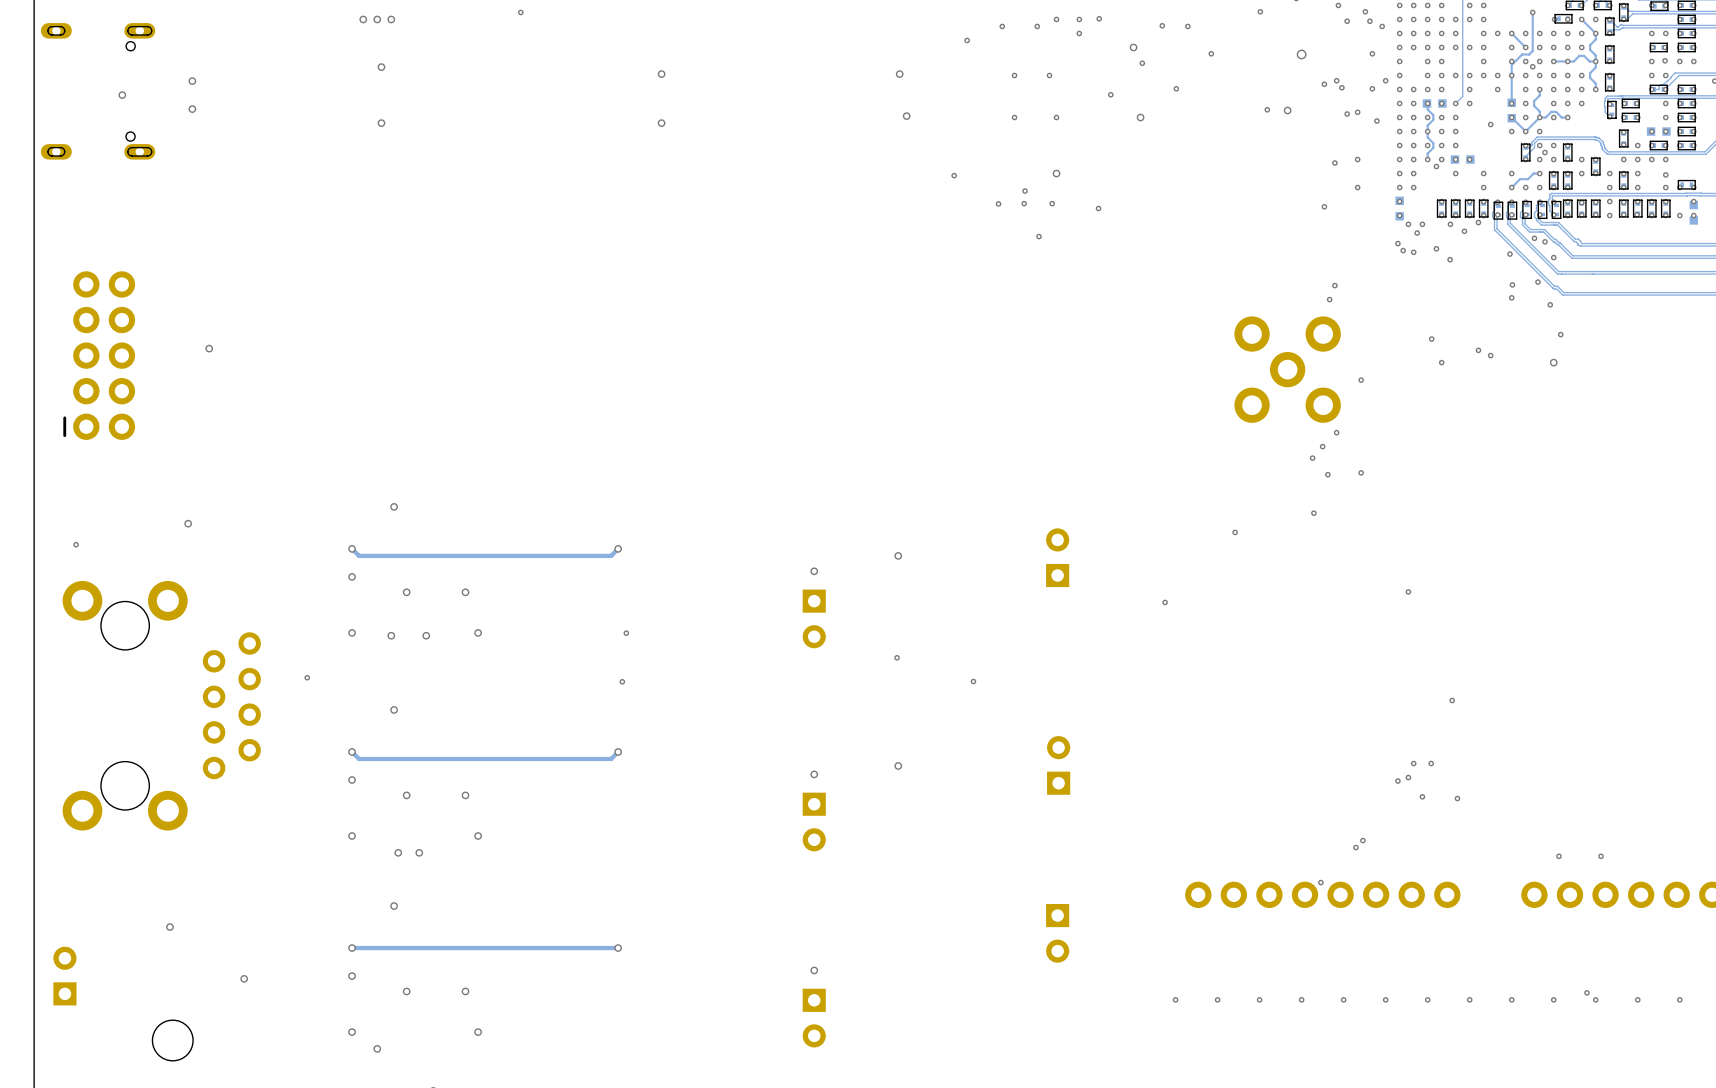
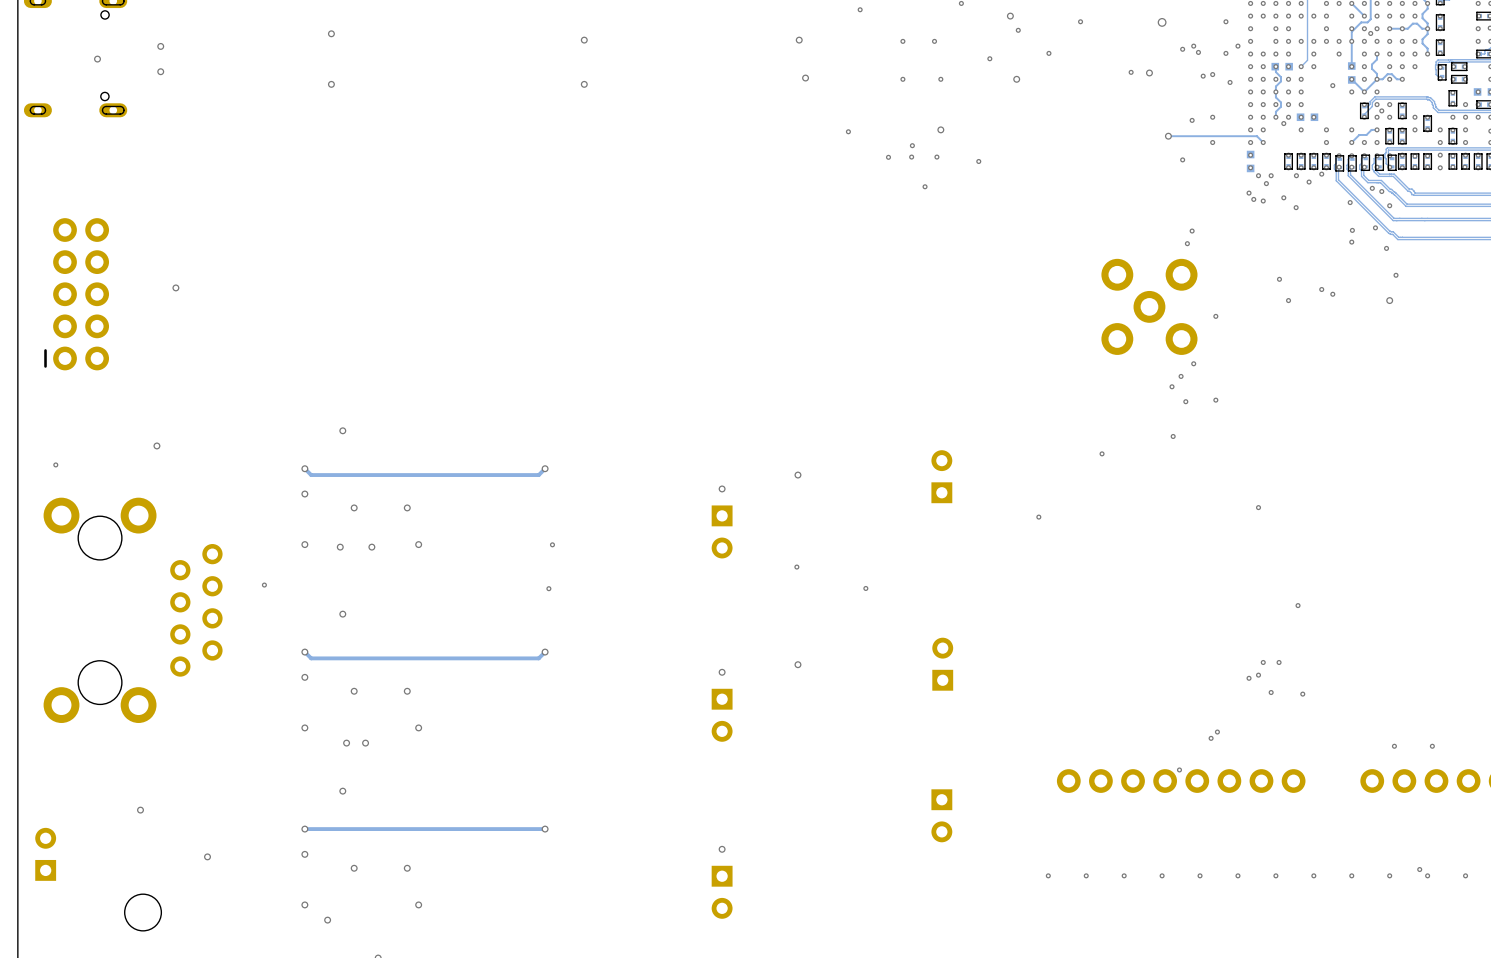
track: none -> (1168, 136) (1256, 136) (1263, 142)
via: none -> (1168, 136)

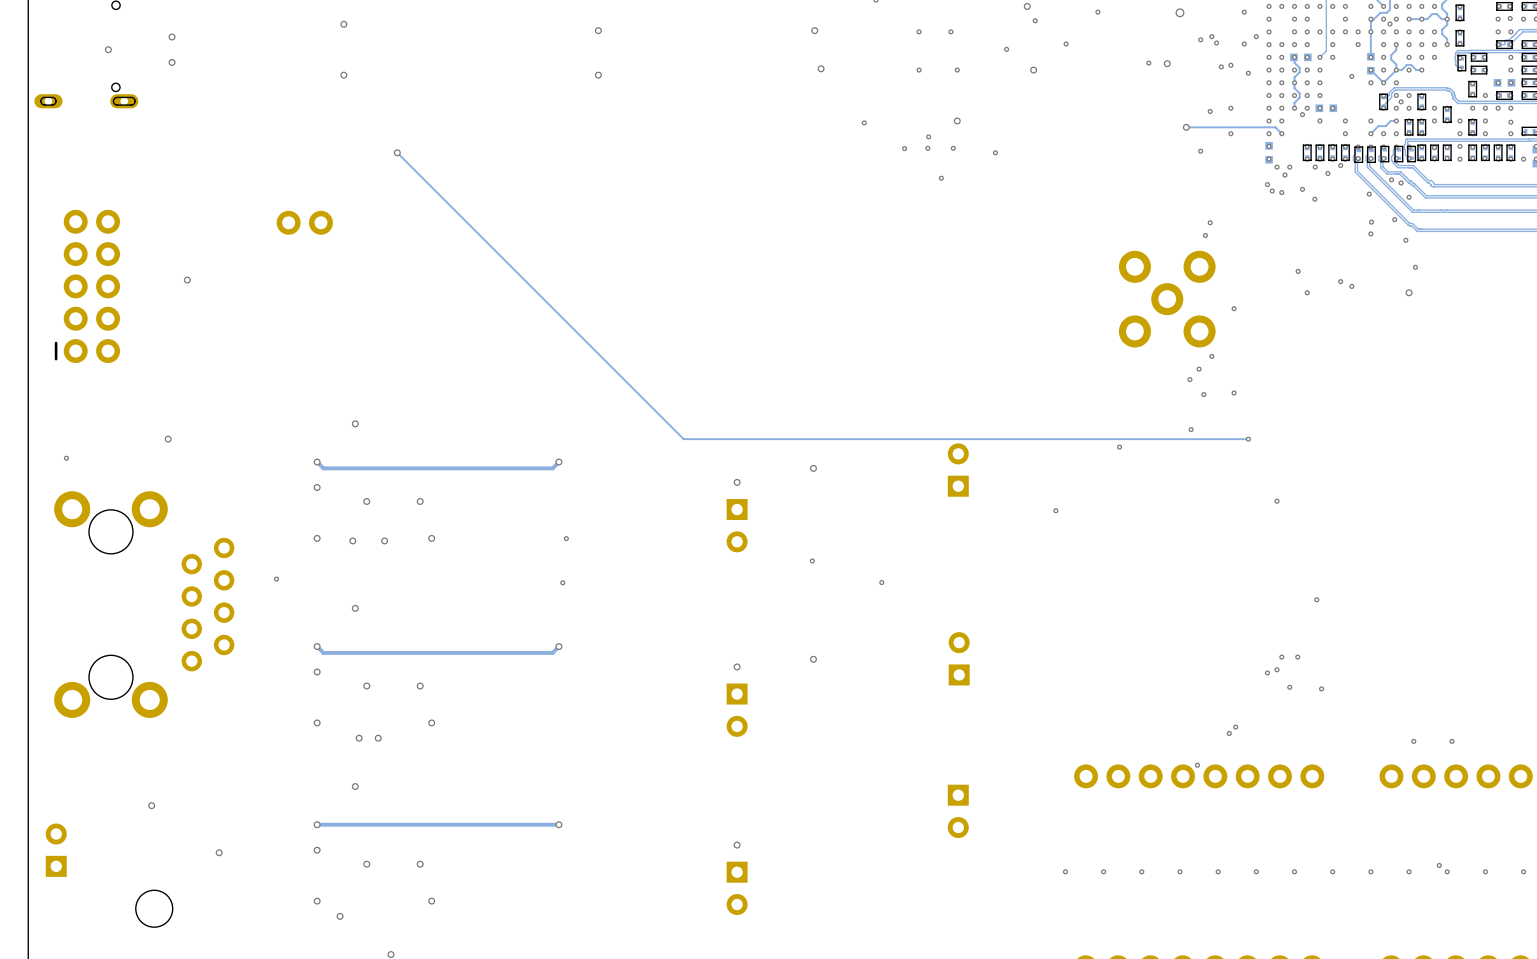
track: none -> (397, 152) (683, 439) (1248, 439)
via: none -> (397, 152)
part: none -> (304, 222)
via: none -> (1248, 439)

